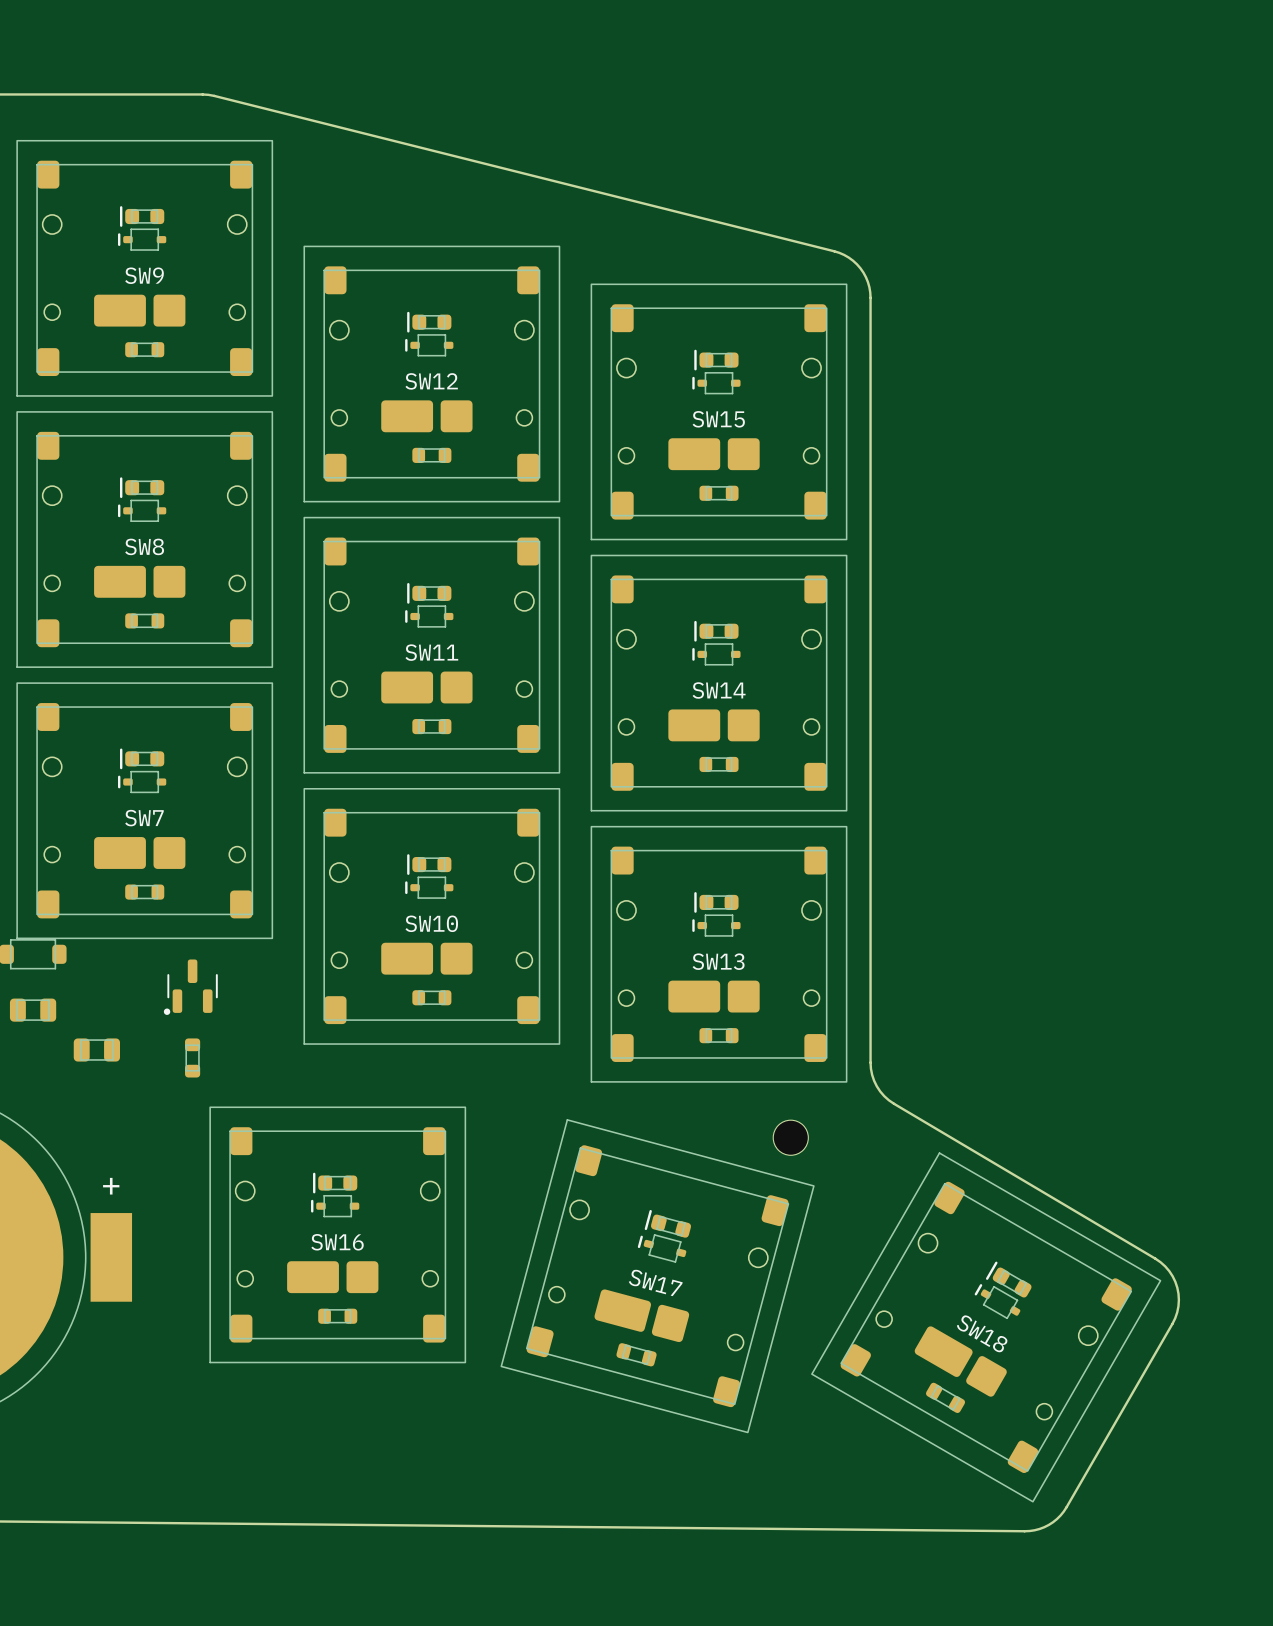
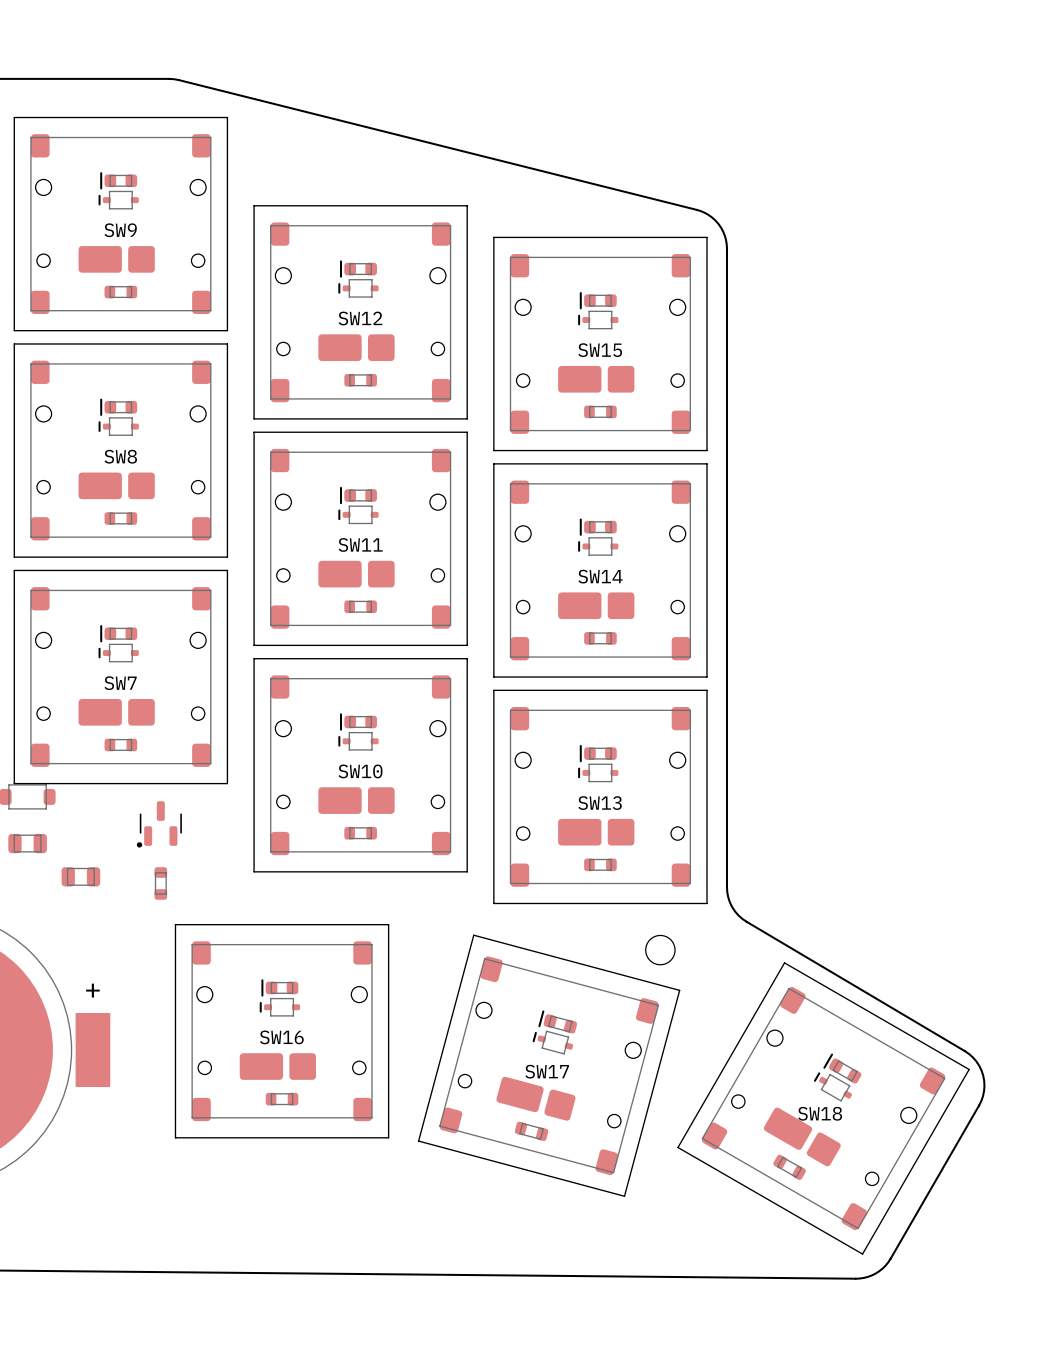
SW9 footprint: [16, 139, 274, 397] -> [13, 116, 229, 332]
SW12 footprint: [303, 245, 561, 503] -> [253, 205, 468, 420]
SW15 footprint: [590, 283, 848, 541] -> [493, 236, 708, 452]
SW8 footprint: [16, 411, 274, 668] -> [13, 343, 229, 558]
SW11 footprint: [303, 516, 561, 774] -> [253, 431, 468, 647]
SW14 footprint: [590, 554, 848, 812] -> [493, 463, 708, 678]
SW7 footprint: [16, 682, 274, 940] -> [13, 569, 229, 785]
SW10 footprint: [303, 787, 561, 1045] -> [253, 658, 468, 873]
SW13 footprint: [590, 825, 848, 1083] -> [493, 689, 708, 905]
SW16 footprint: [209, 1106, 467, 1364] -> [174, 923, 390, 1139]
SW17 footprint: [500, 1119, 815, 1434] -> [417, 934, 681, 1197]
SW18 footprint: [811, 1152, 1162, 1503] -> [677, 962, 970, 1255]

